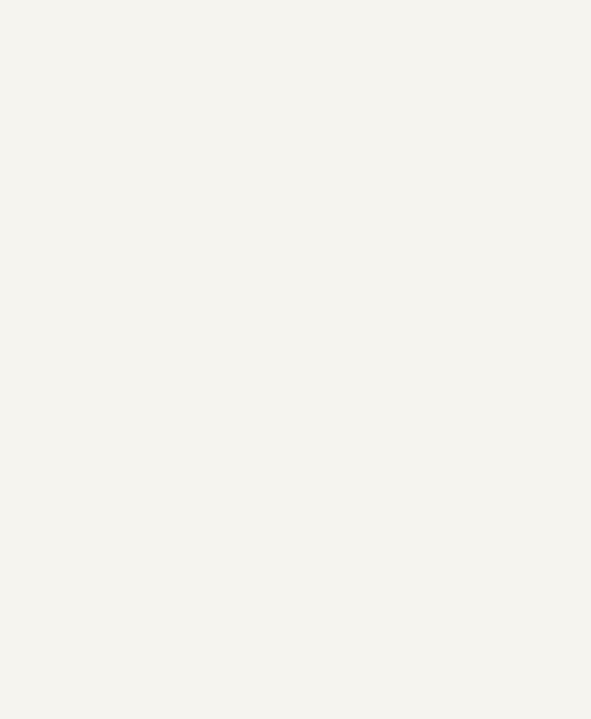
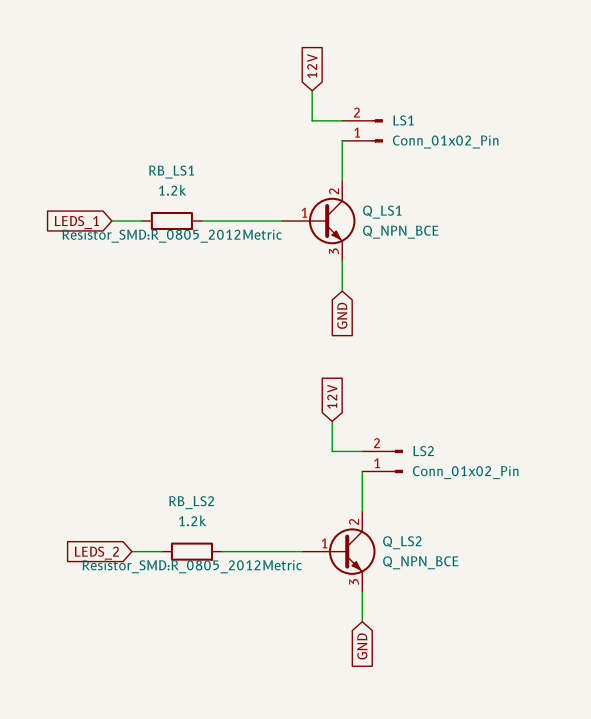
global label: none -> 12V (312, 66)
wire: none -> (312, 90) (312, 120) (342, 120)
LS1: none -> Conn_01x02_Pin (362, 130)
wire: none -> (342, 140) (342, 180)
wire: none -> (111, 221) (141, 221)
RB_LS1: none -> 1.2k (171, 221)
wire: none -> (201, 221) (282, 221)
Q_LS1: none -> Q_NPN_BCE (318, 221)
global label: none -> LEDS_1 (76, 222)
wire: none -> (342, 261) (342, 291)
global label: none -> GND (342, 315)
global label: none -> 12V (332, 396)
wire: none -> (332, 421) (332, 451) (362, 451)
LS2: none -> Conn_01x02_Pin (382, 461)
wire: none -> (362, 471) (362, 511)
wire: none -> (131, 551) (161, 551)
RB_LS2: none -> 1.2k (191, 551)
wire: none -> (222, 551) (302, 551)
Q_LS2: none -> Q_NPN_BCE (338, 551)
global label: none -> LEDS_2 (96, 553)
wire: none -> (362, 591) (362, 621)
global label: none -> GND (362, 646)

